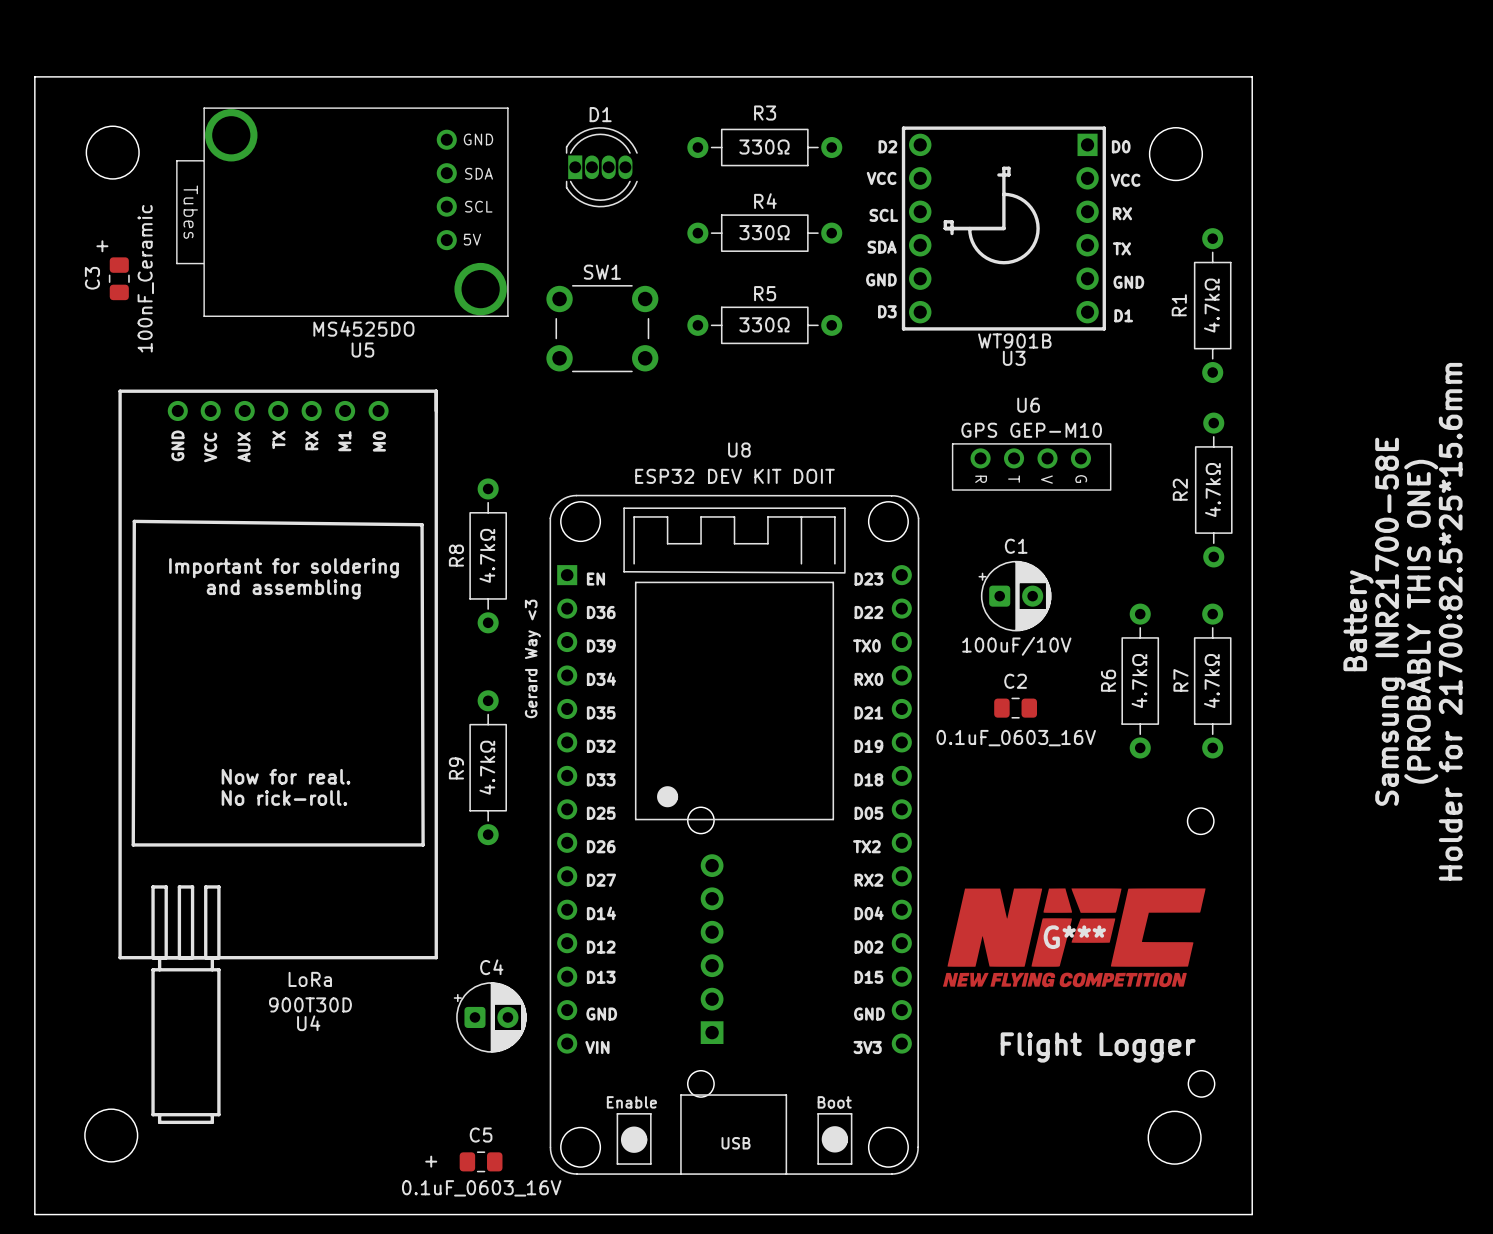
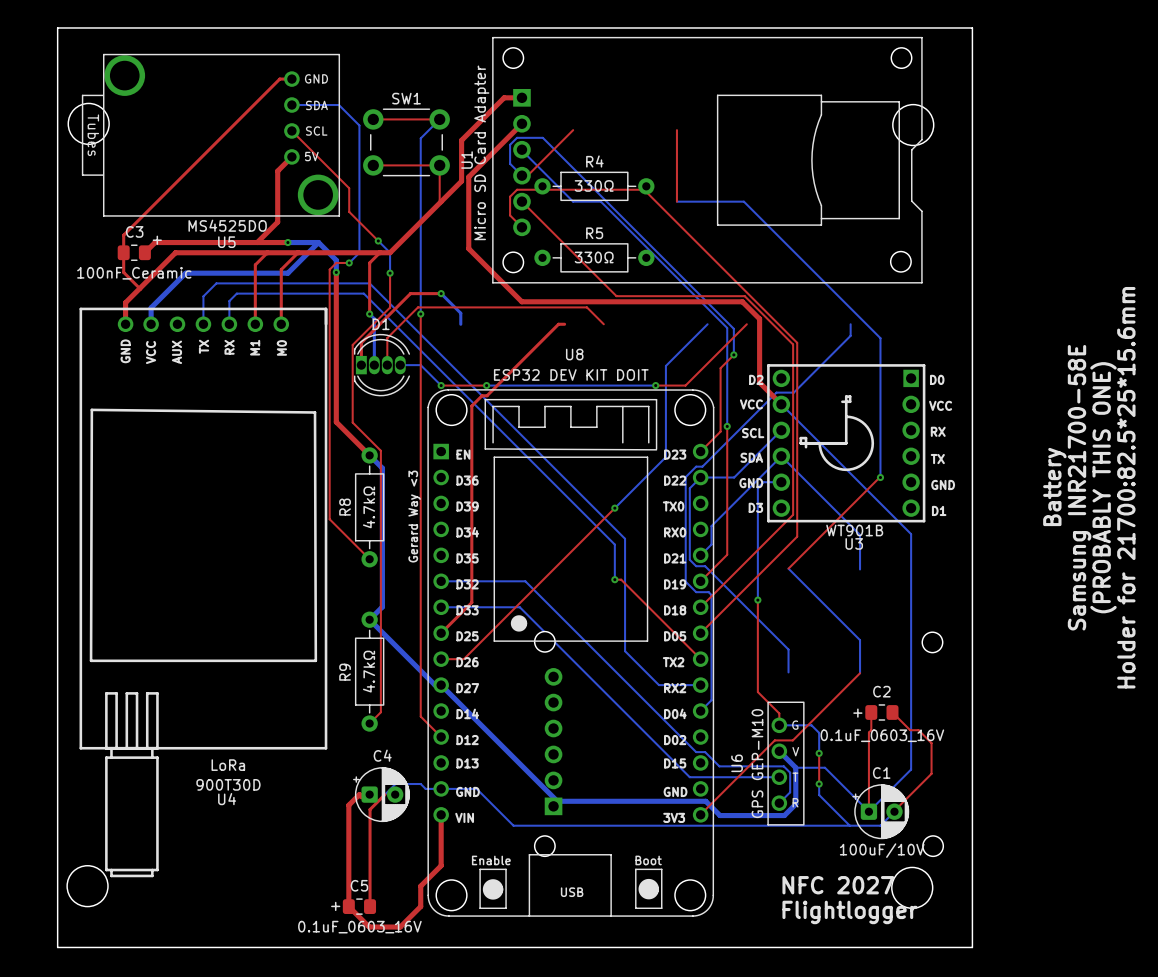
board edge: (1252, 76) (34, 76) (34, 1214) (72, 1214) -> (972, 65) (972, 27) (57, 27) (57, 947)
top track: none -> (291, 79) (279, 79) (123, 235) (123, 272) (139, 288)
top track: none -> (521, 97) (504, 97) (461, 140) (461, 181) (390, 252) (175, 252) (125, 302) (125, 324)
bottom track: none -> (291, 105) (338, 105) (359, 125) (359, 252) (349, 262)
top track: none -> (373, 119) (439, 119)
bottom track: none -> (439, 119) (420, 138) (420, 314)
R3: (764, 147) -> none
top track: none -> (521, 123) (468, 177) (468, 248) (521, 301) (742, 301) (759, 318) (759, 382) (781, 404)
top track: none -> (573, 130) (527, 175) (521, 175)
top track: none -> (676, 130) (676, 201)
top track: none -> (291, 130) (349, 188) (349, 211) (378, 240)
D1 position: (601, 167) -> (382, 365)
bottom track: none -> (521, 149) (573, 201) (600, 201) (727, 327) (727, 426)
top track: none -> (291, 156) (277, 171) (277, 222) (257, 242)
U1: none -> Micro SD Card Adapter (707, 160)
top track: none -> (373, 165) (439, 165) (441, 201)
U5 position: (342, 212) -> (210, 135)
bottom track: none -> (521, 175) (510, 163) (510, 144) (517, 137) (542, 137) (733, 328) (733, 354)
U3 position: (1003, 228) -> (846, 443)
text position: + (102, 246) -> + (157, 240)
top track: none -> (521, 201) (616, 296) (744, 296) (793, 344) (793, 514) (700, 607)
bottom track: none -> (676, 201) (743, 201) (880, 338) (880, 477)
C3 rotation: 0° (119, 278) -> 90° clockwise (134, 252)
C3 position: (119, 278) -> (134, 252)
top track: none -> (521, 227) (510, 215) (510, 196) (517, 189) (644, 189) (797, 342) (797, 536) (700, 633)
bottom track: none -> (378, 240) (390, 252) (390, 273)
via: none -> (378, 240)
top track: none -> (287, 242) (155, 242) (144, 252)
bottom track: none -> (287, 242) (318, 242)
via: none -> (287, 242)
bottom track: none -> (318, 242) (287, 273) (185, 273) (151, 307) (151, 324)
bottom track: none -> (318, 242) (336, 260) (336, 272)
R1: (1212, 305) -> none
top track: none -> (267, 252) (255, 264) (255, 324)
top track: none -> (298, 252) (281, 269) (281, 324)
top track: none -> (379, 252) (369, 262) (369, 314)
SW1 position: (602, 328) -> (406, 142)
top track: none -> (349, 262) (336, 262) (329, 269) (329, 519) (369, 559)
via: none -> (349, 262)
top track: none -> (336, 272) (336, 422) (369, 455)
via: none -> (336, 272)
top track: none -> (390, 273) (390, 307) (352, 344) (352, 422) (380, 450) (380, 712) (369, 723)
via: none -> (390, 273)
top track: none -> (441, 293) (410, 293) (361, 342) (361, 365)
bottom track: none -> (441, 293) (460, 313) (460, 324)
via: none -> (441, 293)
bottom track: none -> (369, 314) (374, 318) (374, 365)
via: none -> (369, 314)
top track: none -> (420, 314) (420, 716) (441, 737)
via: none -> (420, 314)
bottom track: none -> (203, 324) (203, 296) (216, 283) (369, 283) (625, 538) (625, 651) (658, 685) (700, 685)
bottom track: none -> (229, 324) (229, 301) (236, 293) (363, 293) (614, 544) (614, 579)
top track: none -> (564, 324) (558, 324) (487, 395) (482, 395) (471, 405) (471, 602) (441, 633)
top track: none -> (603, 324) (586, 307) (417, 307) (387, 338) (387, 365)
bottom track: none -> (707, 324) (665, 365) (665, 457) (614, 508)
top track: none -> (746, 324) (685, 385) (655, 385)
bottom track: none -> (850, 324) (850, 335) (793, 392) (776, 392) (702, 466) (696, 466) (685, 477) (685, 581) (696, 592) (708, 592) (711, 594) (711, 700) (700, 711)
top track: none -> (733, 354) (720, 368) (720, 431) (700, 451)
via: none -> (733, 354)
bottom track: none -> (400, 365) (420, 365) (441, 385)
U6 rotation: 0° (1031, 466) -> 90° counterclockwise (785, 763)
U6 position: (1031, 466) -> (785, 763)
top track: none -> (441, 385) (486, 385)
via: none -> (441, 385)
bottom track: none -> (486, 385) (655, 385)
via: none -> (486, 385)
via: none -> (655, 385)
R2: (1213, 490) -> none
bottom track: none -> (781, 404) (911, 534) (911, 769) (868, 811) (824, 767) (795, 767)
top track: none -> (727, 426) (727, 554) (700, 581)
via: none -> (727, 426)
bottom track: none -> (781, 430) (734, 477) (700, 477) (689, 488) (689, 559) (696, 566) (705, 566) (788, 649) (788, 672)
R8 position: (488, 555) -> (369, 507)
text: Important for soldering (283, 568) -> none
bottom track: none -> (369, 455) (382, 468) (382, 606) (369, 619) (435, 685) (441, 685) (557, 801) (705, 801) (720, 815) (784, 815) (795, 804) (795, 767)
text: and assembling (283, 589) -> none
C1 position: (1014, 596) -> (880, 811)
top track: none -> (880, 477) (788, 568)
via: none -> (880, 477)
bottom track: none -> (781, 482) (763, 482) (757, 487) (757, 600)
top track: none -> (614, 508) (463, 659) (441, 659)
via: none -> (614, 508)
R6: (1140, 681) -> none
R7: (1212, 681) -> none
bottom track: none -> (700, 555) (711, 544) (711, 526) (781, 456) (860, 534) (860, 569)
C2 position: (1015, 708) -> (881, 712)
bottom track: none -> (788, 568) (860, 640) (860, 673)
top track: none -> (614, 579) (621, 579) (700, 659)
via: none -> (614, 579)
bottom track: none -> (441, 581) (525, 581) (696, 752) (705, 752) (719, 766) (783, 766) (790, 772) (790, 792) (779, 803)
U4 position: (278, 756) -> (203, 592)
top track: none -> (757, 600) (757, 692) (779, 713) (779, 725)
via: none -> (757, 600)
R9 position: (488, 767) -> (369, 671)
bottom track: none -> (441, 607) (519, 607) (689, 777) (779, 777)
text: Now for real. (286, 776) -> none
text: No rick-roll. (284, 797) -> none
top track: none -> (860, 673) (792, 740) (774, 740) (700, 814)
top track: none -> (871, 712) (871, 730) (868, 732) (868, 811)
top track: none -> (892, 712) (910, 730) (918, 730) (931, 743) (931, 773) (894, 811)
text: none -> + (857, 713)
bottom track: none -> (779, 725) (811, 725) (819, 732) (819, 753)
G***: (1074, 937) -> none
bottom track: none -> (779, 751) (795, 767)
top track: none -> (819, 753) (819, 784)
via: none -> (819, 753)
bottom track: none -> (819, 784) (819, 795) (849, 825)
via: none -> (819, 784)
top track: none -> (384, 794) (370, 809) (370, 906)
bottom track: none -> (384, 794) (395, 784) (420, 784) (425, 788) (476, 788) (513, 825) (880, 825) (894, 811)
top track: none -> (361, 796) (359, 794) (348, 805) (348, 906) (369, 927) (400, 927) (420, 906) (420, 886) (441, 865) (441, 814)
text: Flight Logger (1098, 1047) -> none
text: none -> NFC 2027 (838, 885)
C5 position: (481, 1161) -> (359, 906)
text: none -> Flightlogger (850, 912)

